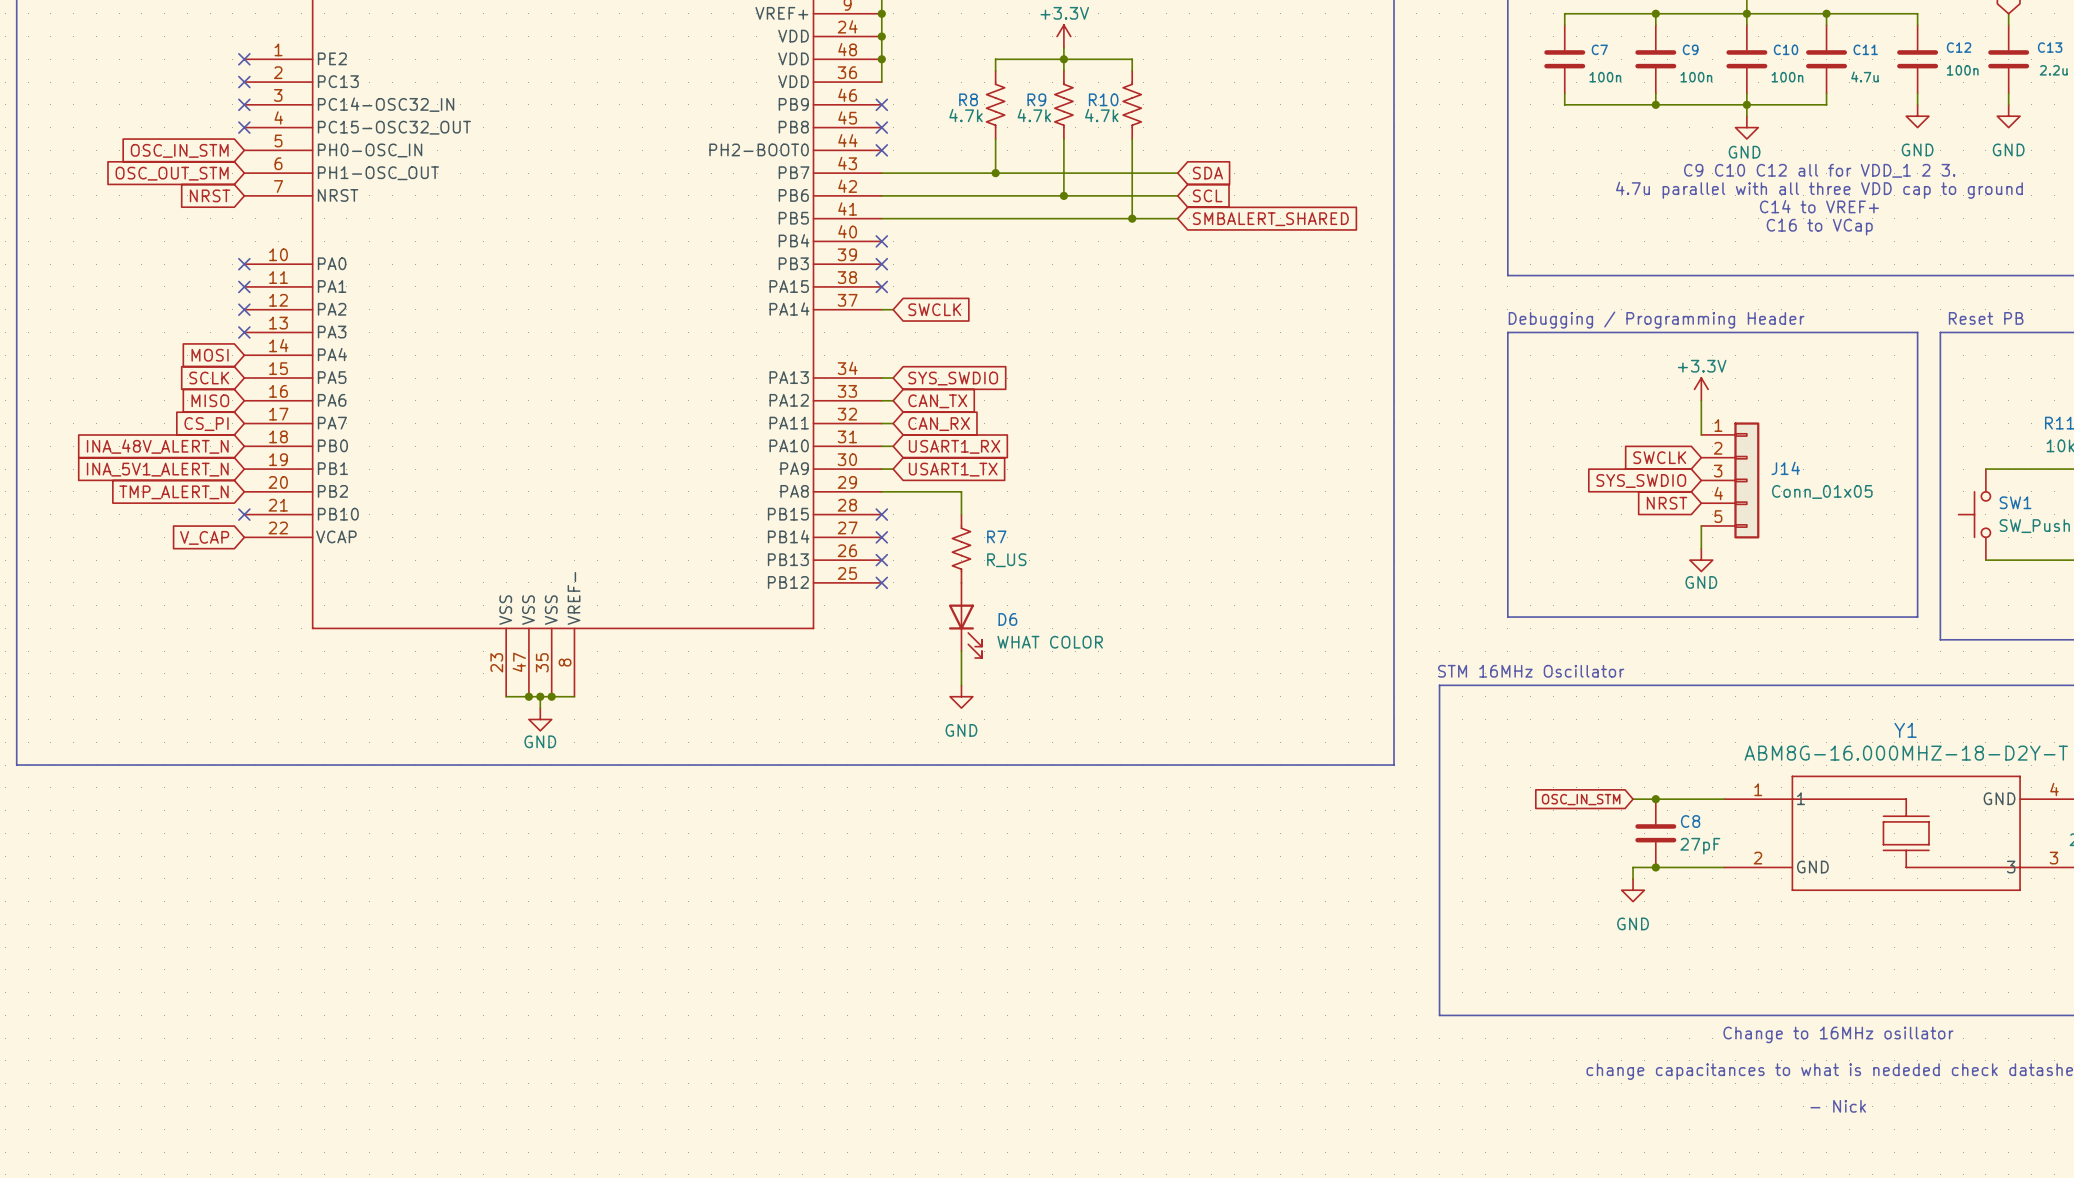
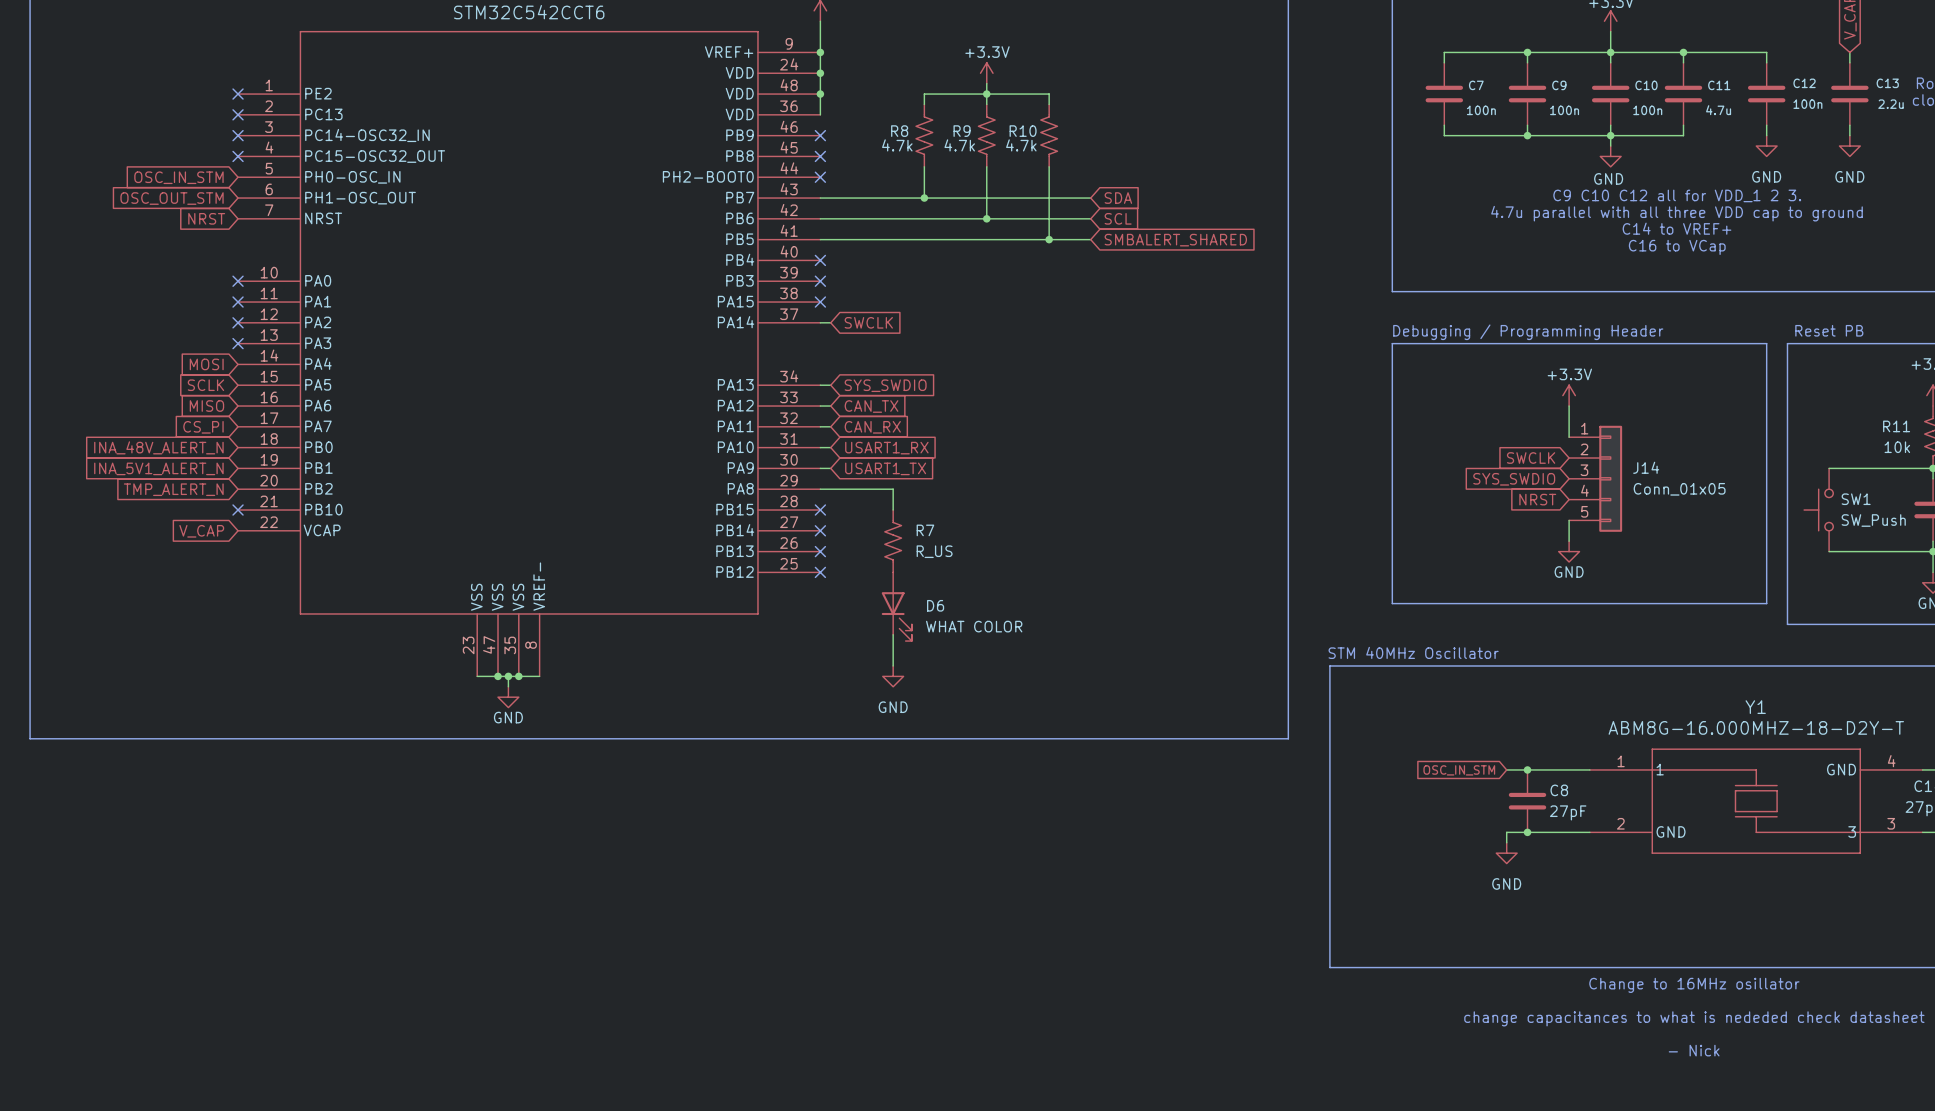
text: STM 16MHz Oscillator (1531, 671) -> STM 40MHz Oscillator (1413, 652)

